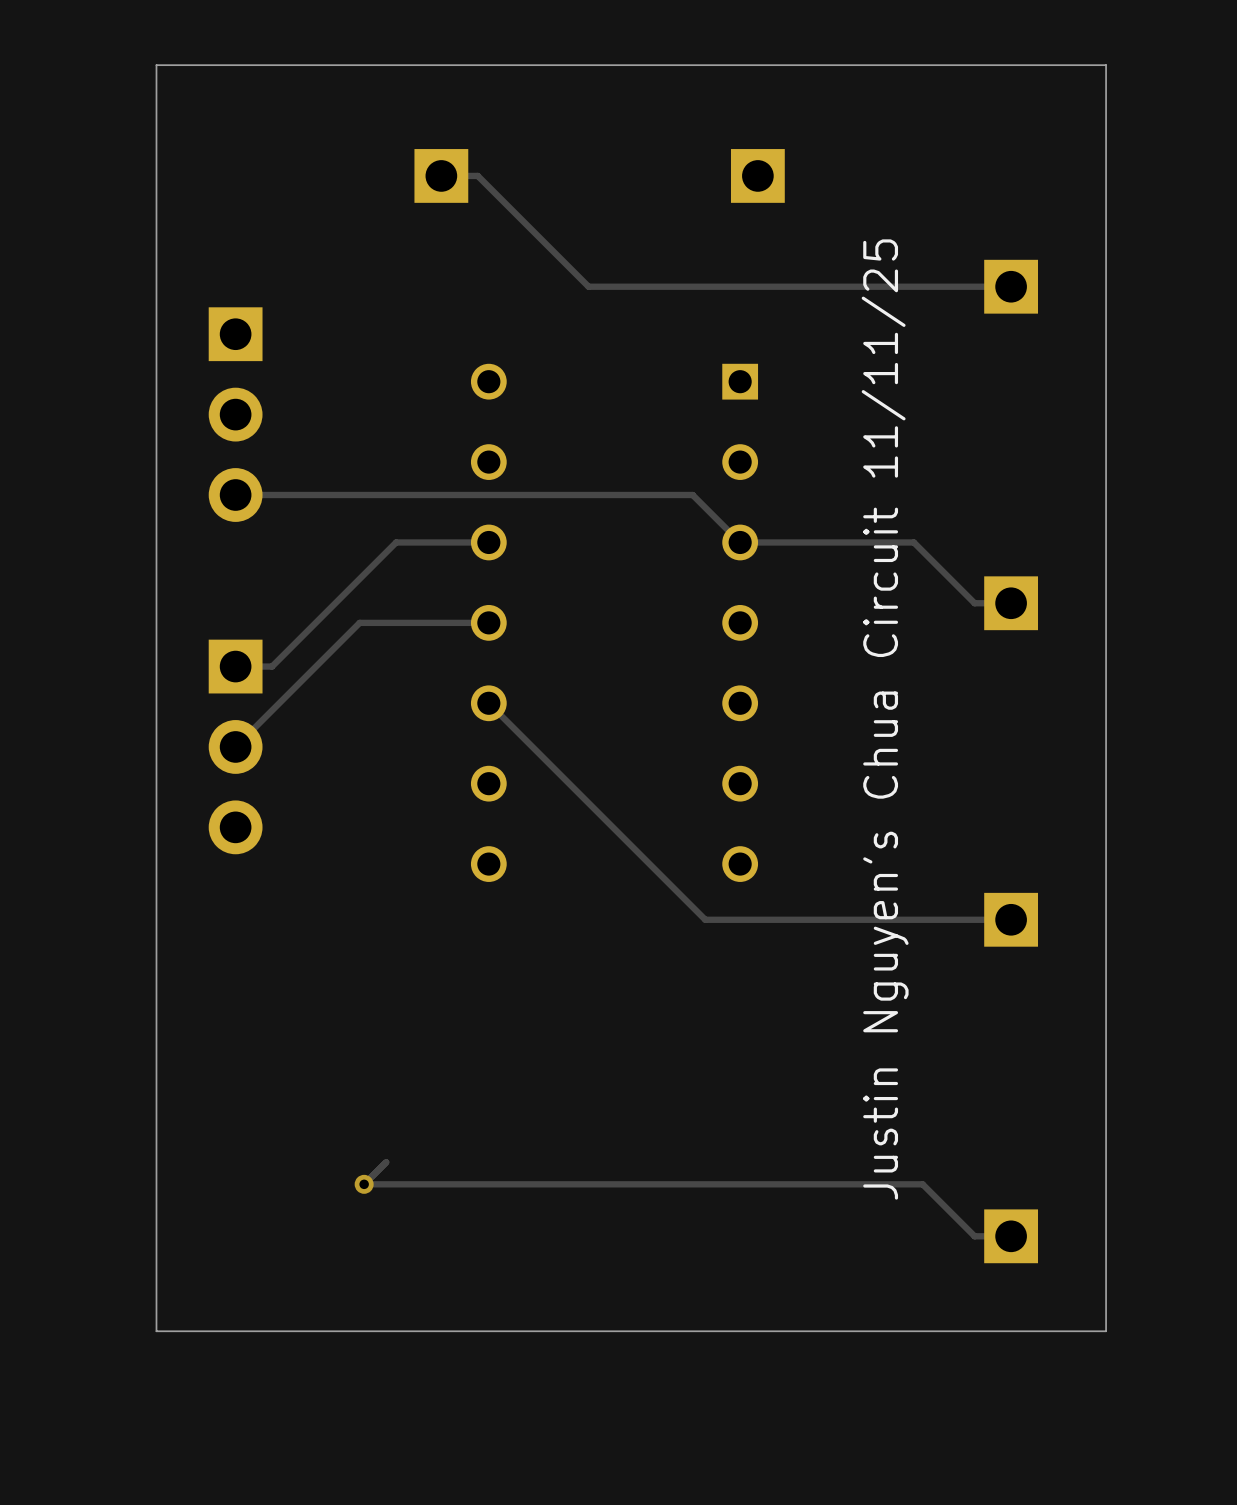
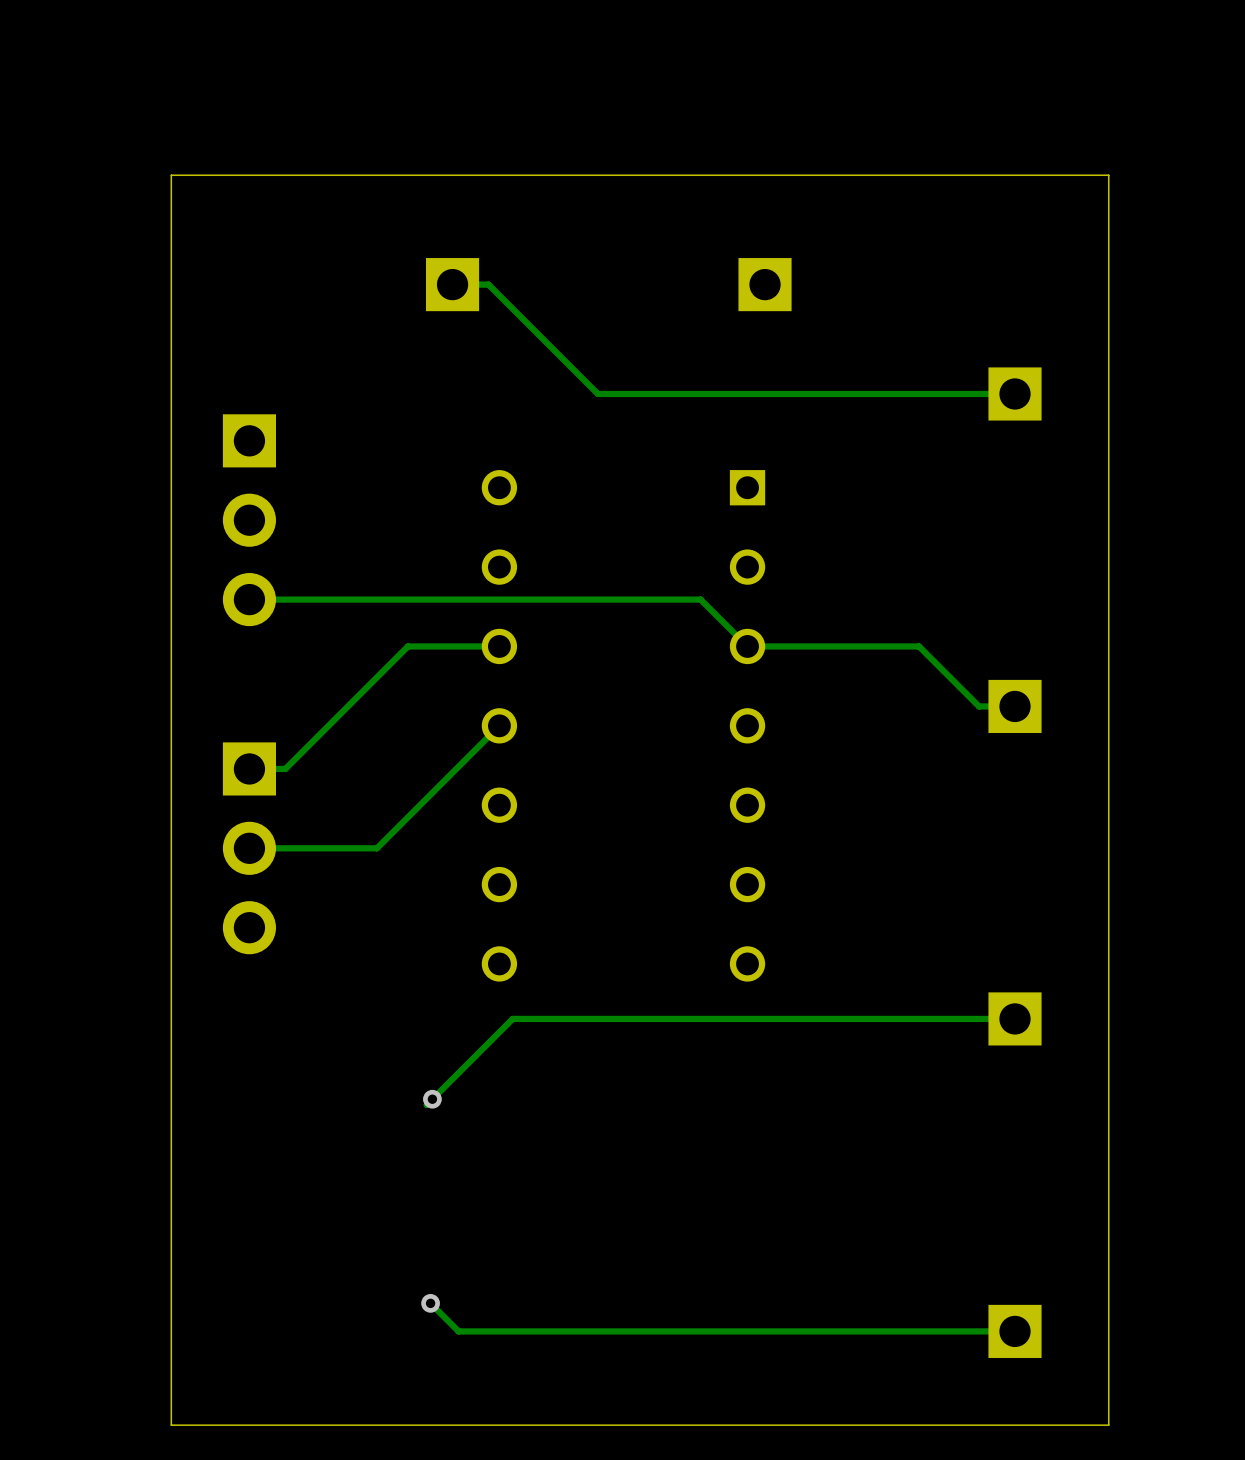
track: (488, 622) (359, 622) (235, 746) -> (499, 725) (376, 848) (249, 848)
track: (488, 703) (705, 919) -> (426, 1104) (512, 1018) (713, 1018)
text: Justin Nguyen's Chua Circuit 11/11/25 (885, 719) -> none
via: none -> (432, 1099)
track: (386, 1162) (364, 1184) (922, 1184) (974, 1236) -> (430, 1303) (458, 1331) (979, 1331)
via position: (364, 1184) -> (430, 1303)

